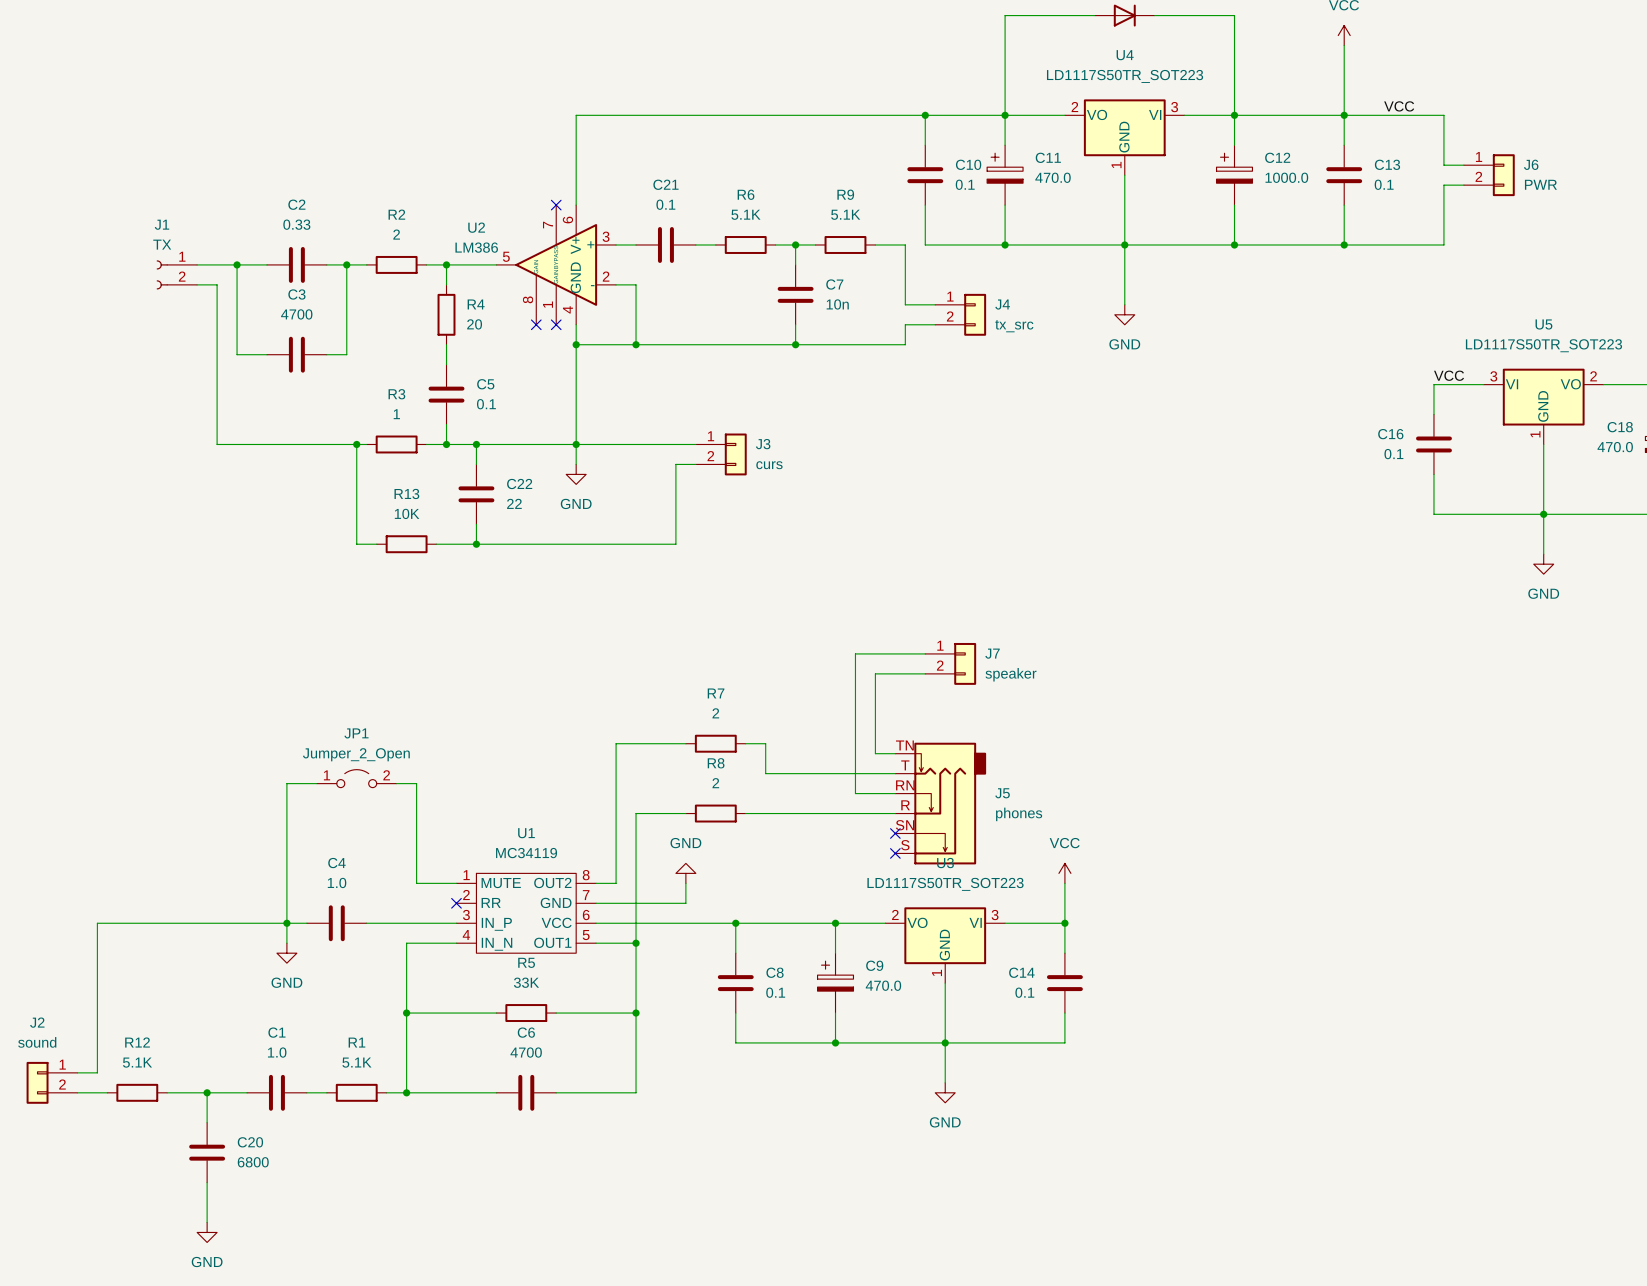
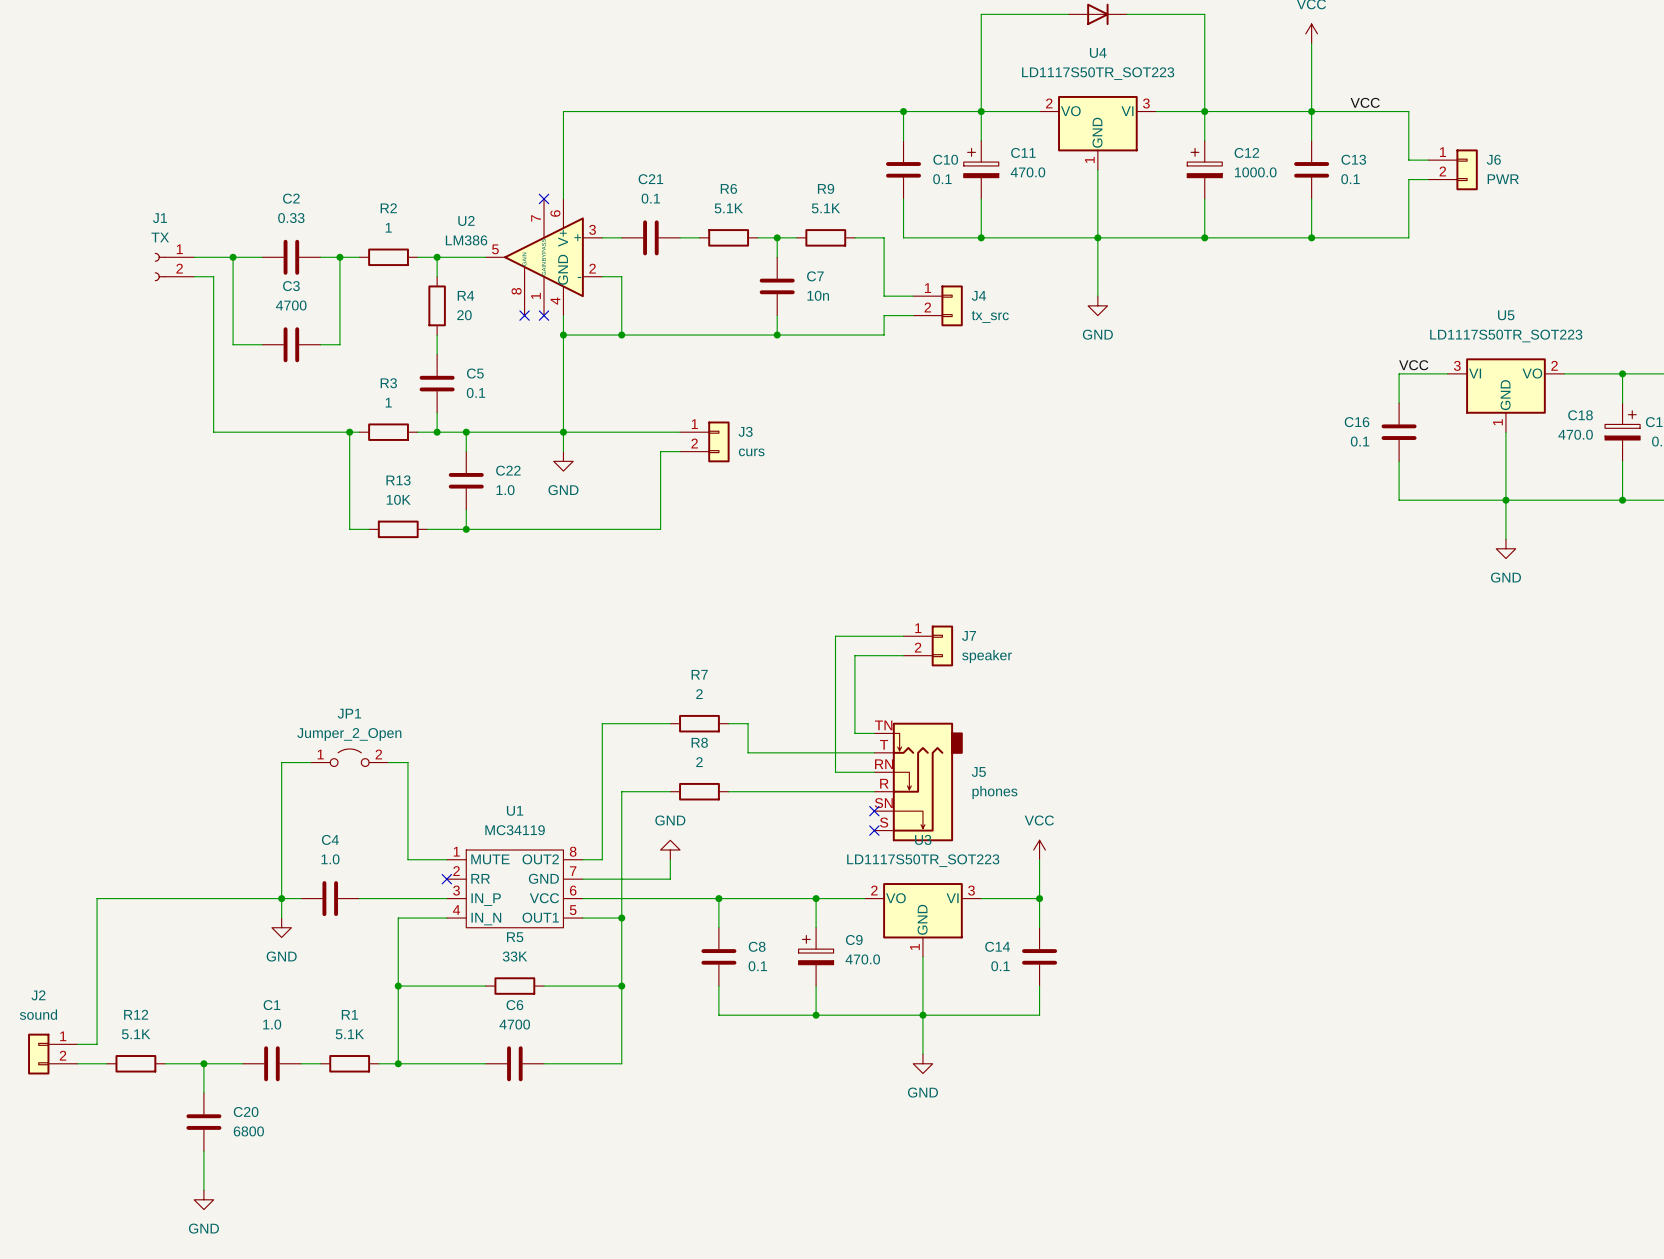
R2 value: 2 (396, 234) -> 1 (388, 227)
C22 value: 22 (514, 503) -> 1.0 (505, 490)

